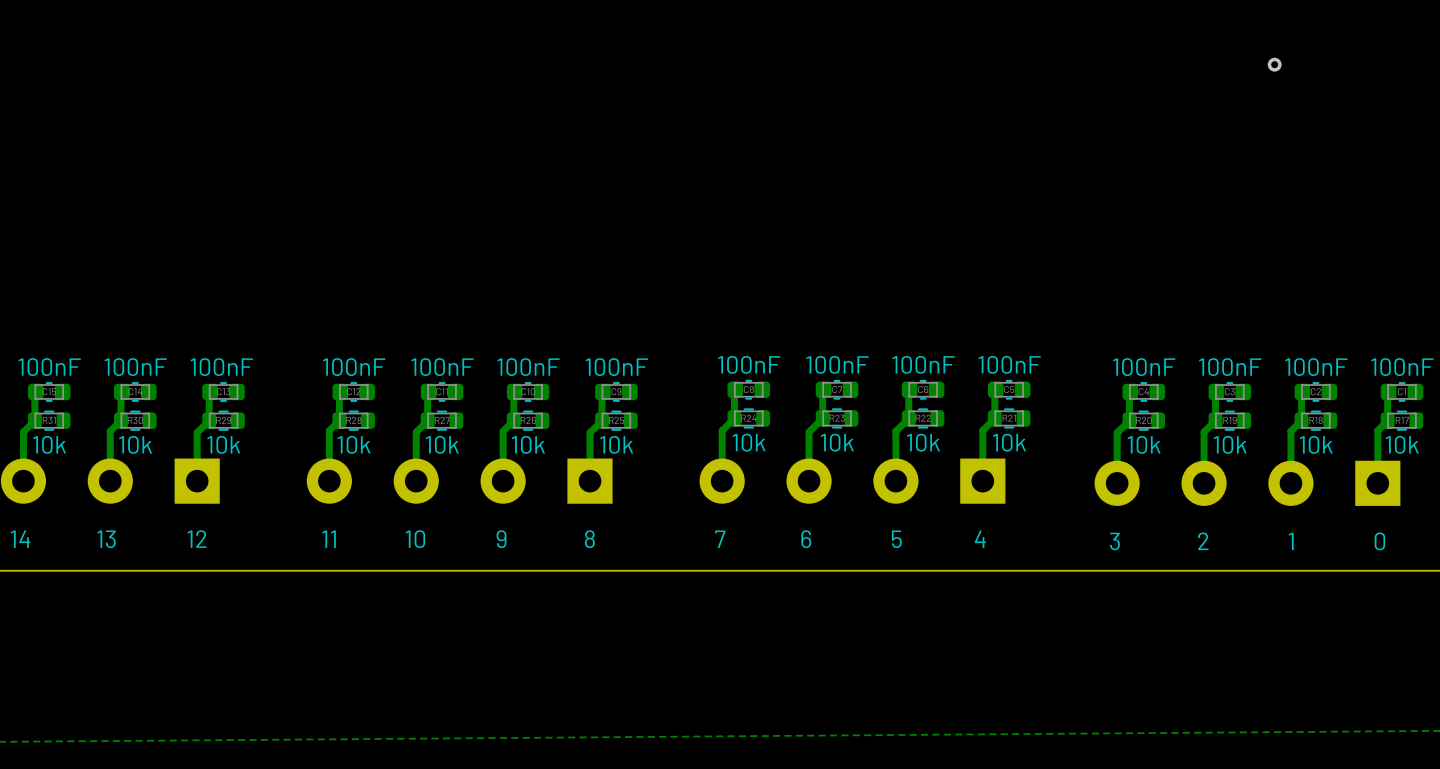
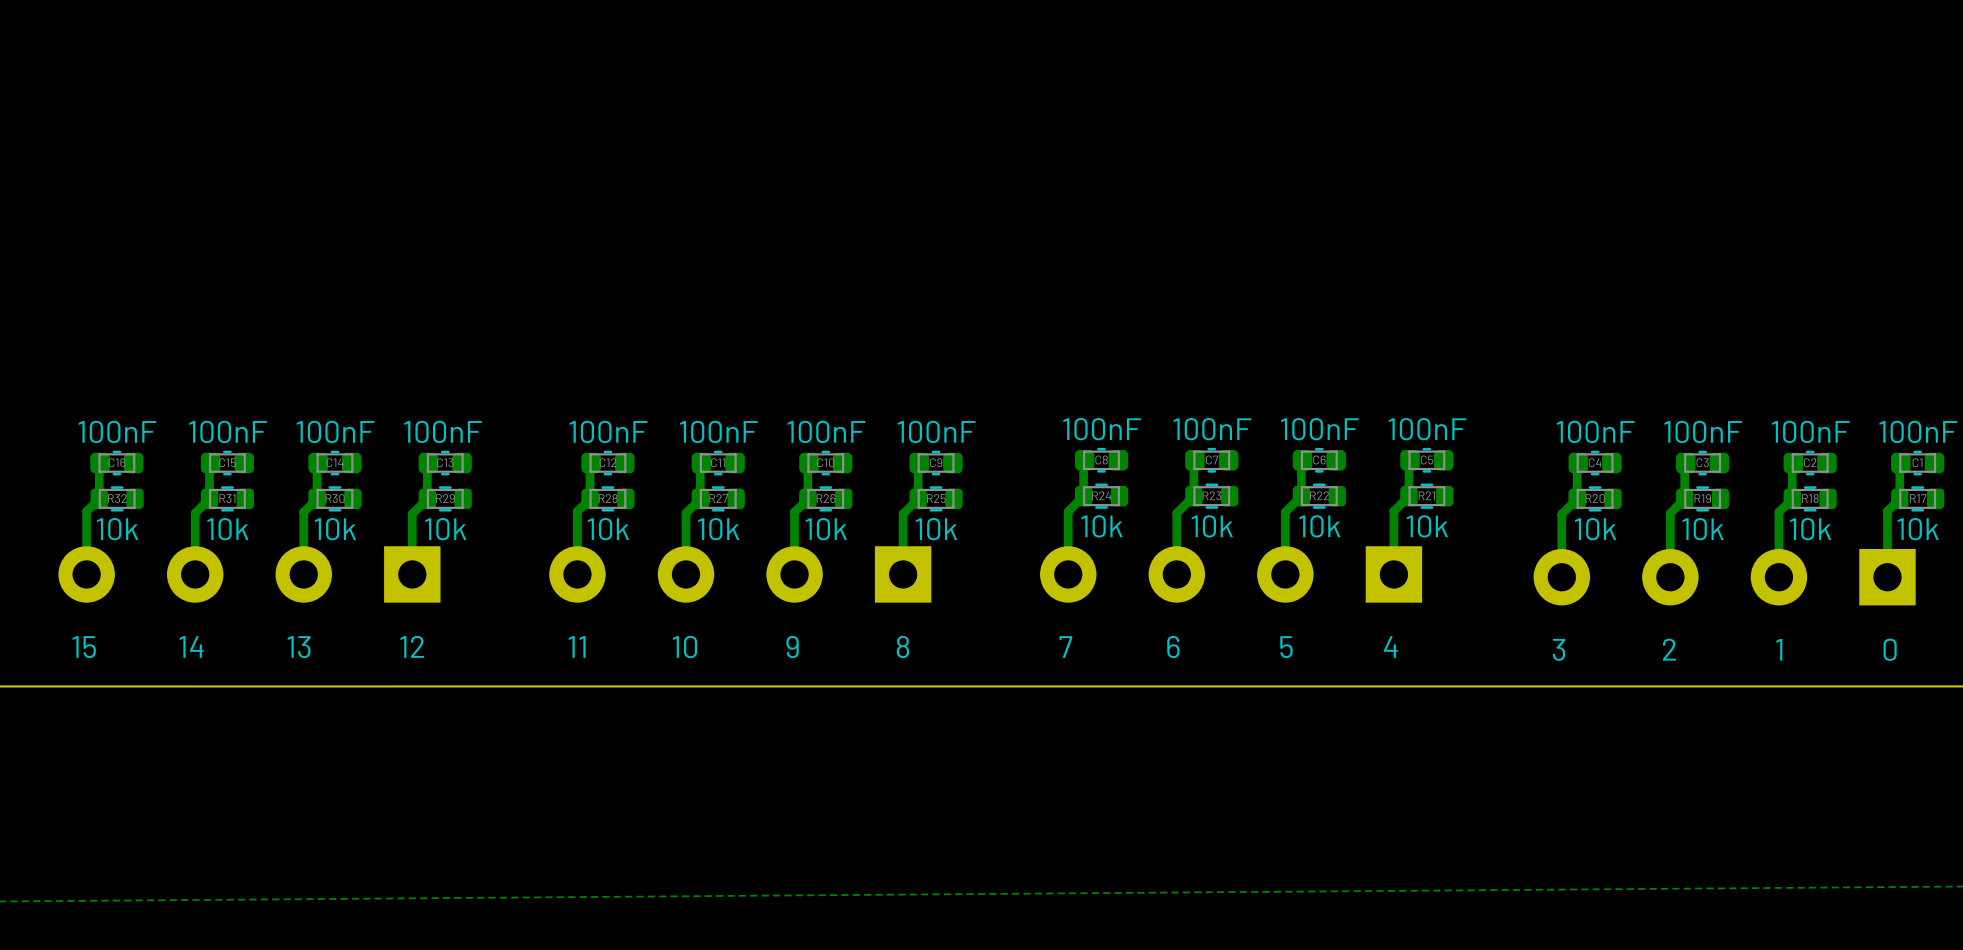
via: (1274, 64) -> none

